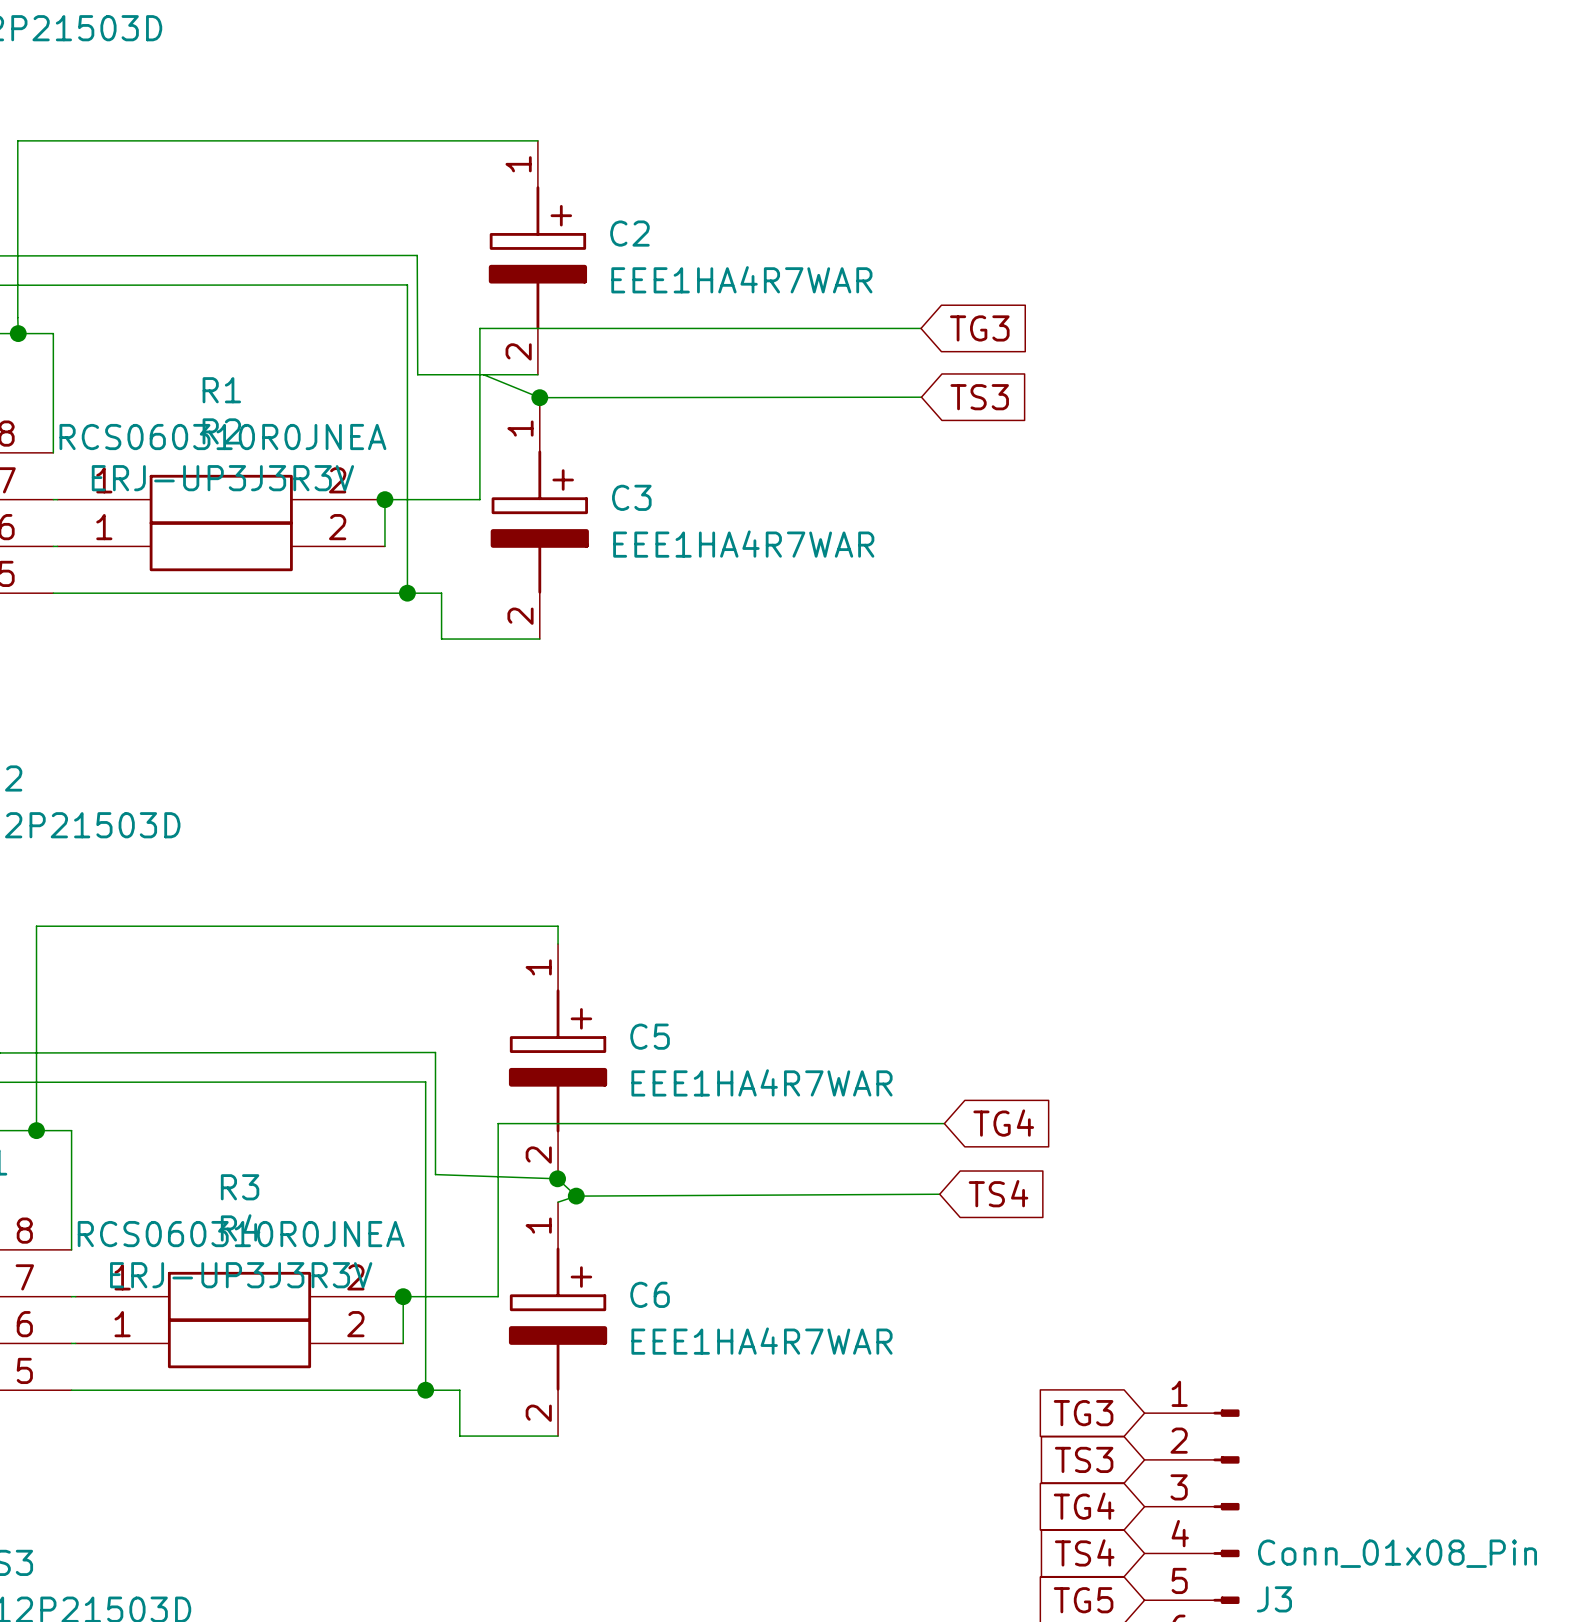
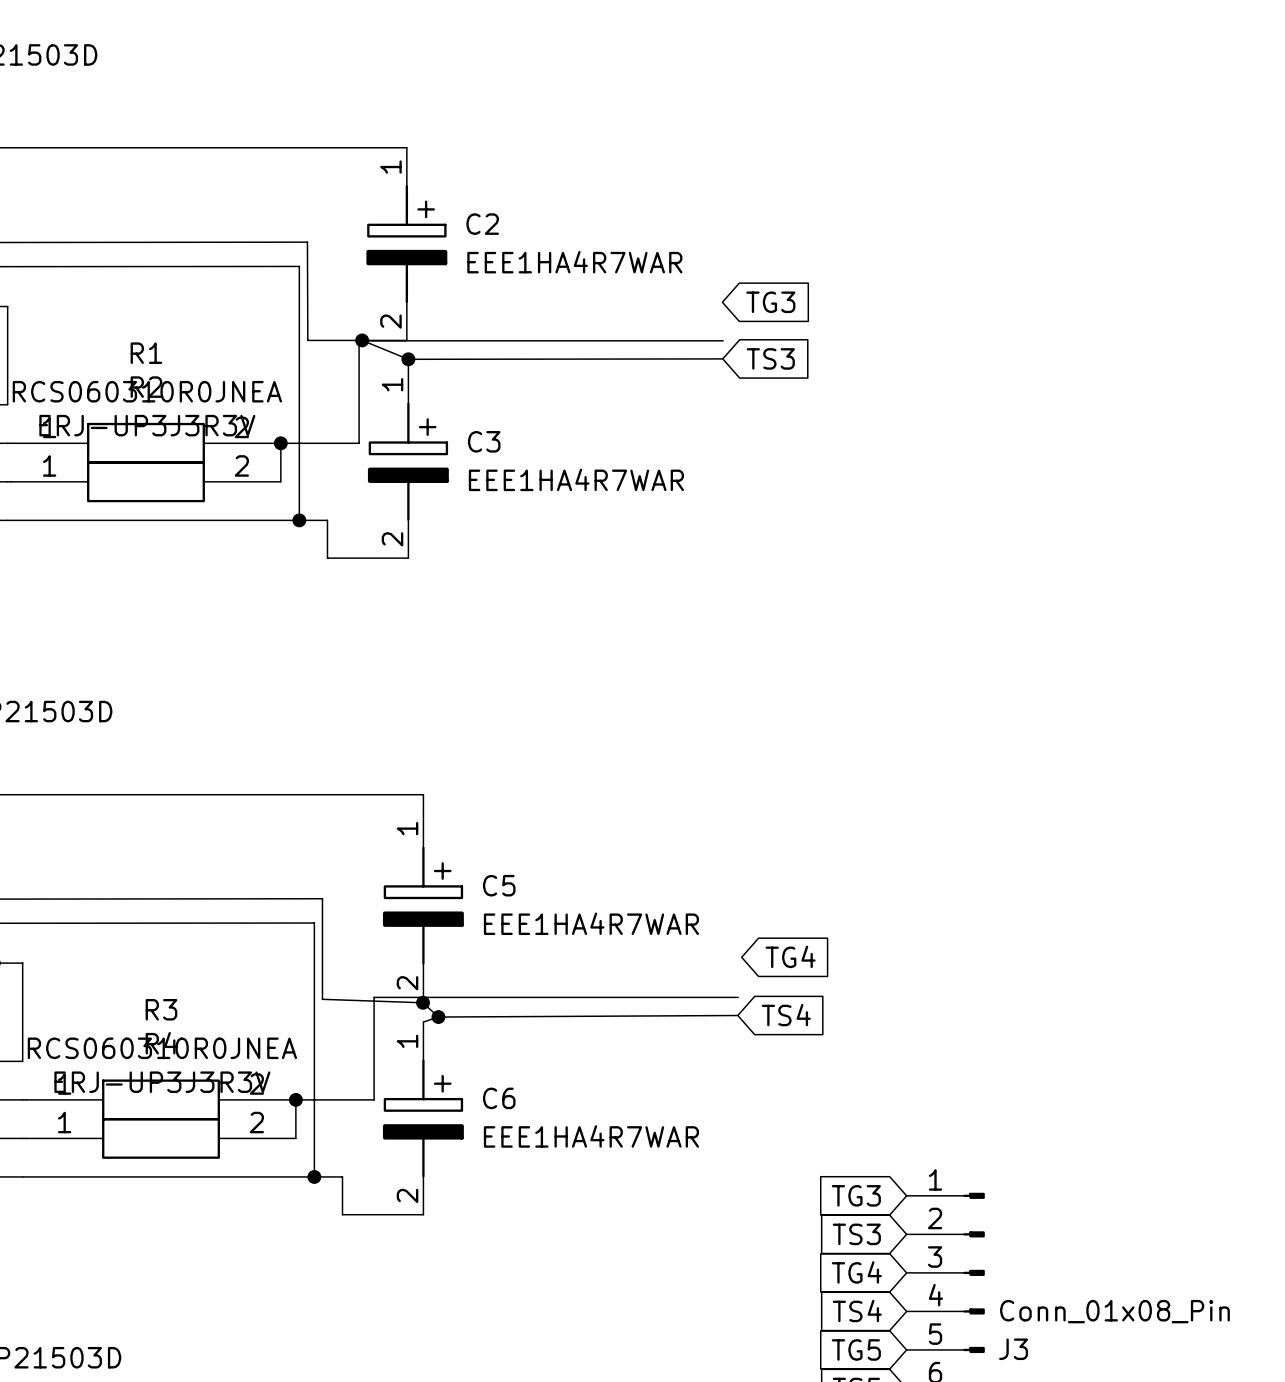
wire: (921, 328) (479, 328) (479, 375) -> (723, 340) (359, 340)
junction: none -> (362, 340)
wire: (944, 1123) (498, 1123) (498, 1172) -> (738, 997) (374, 997)

